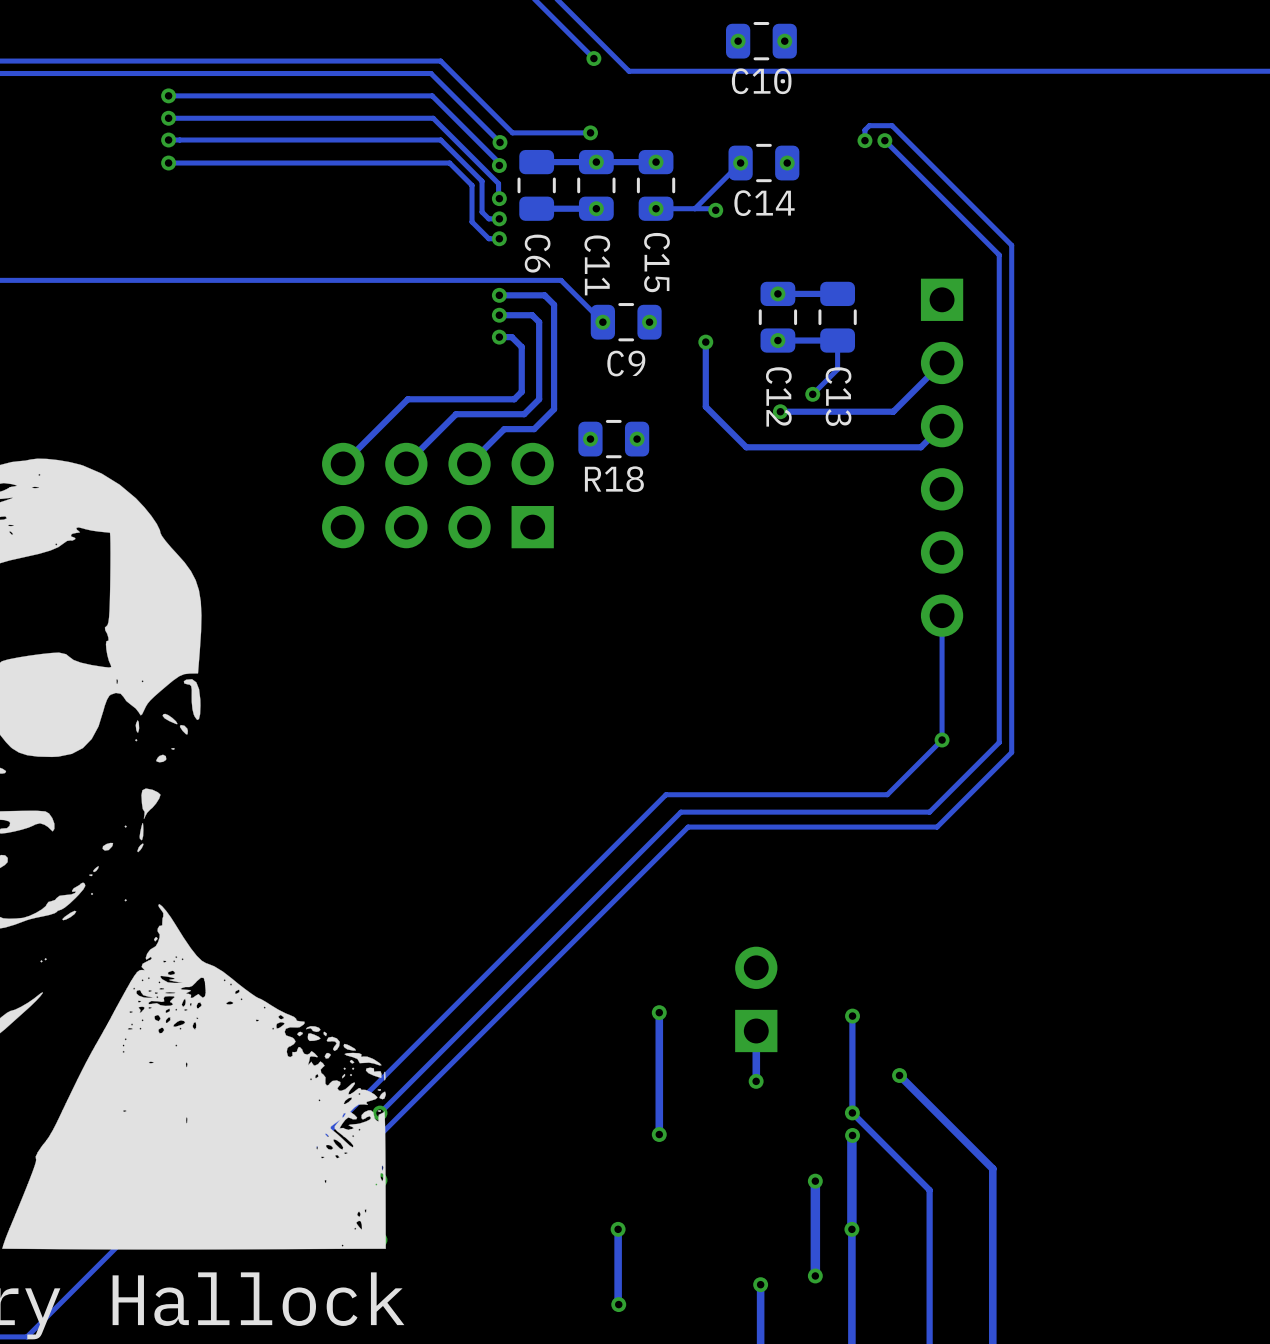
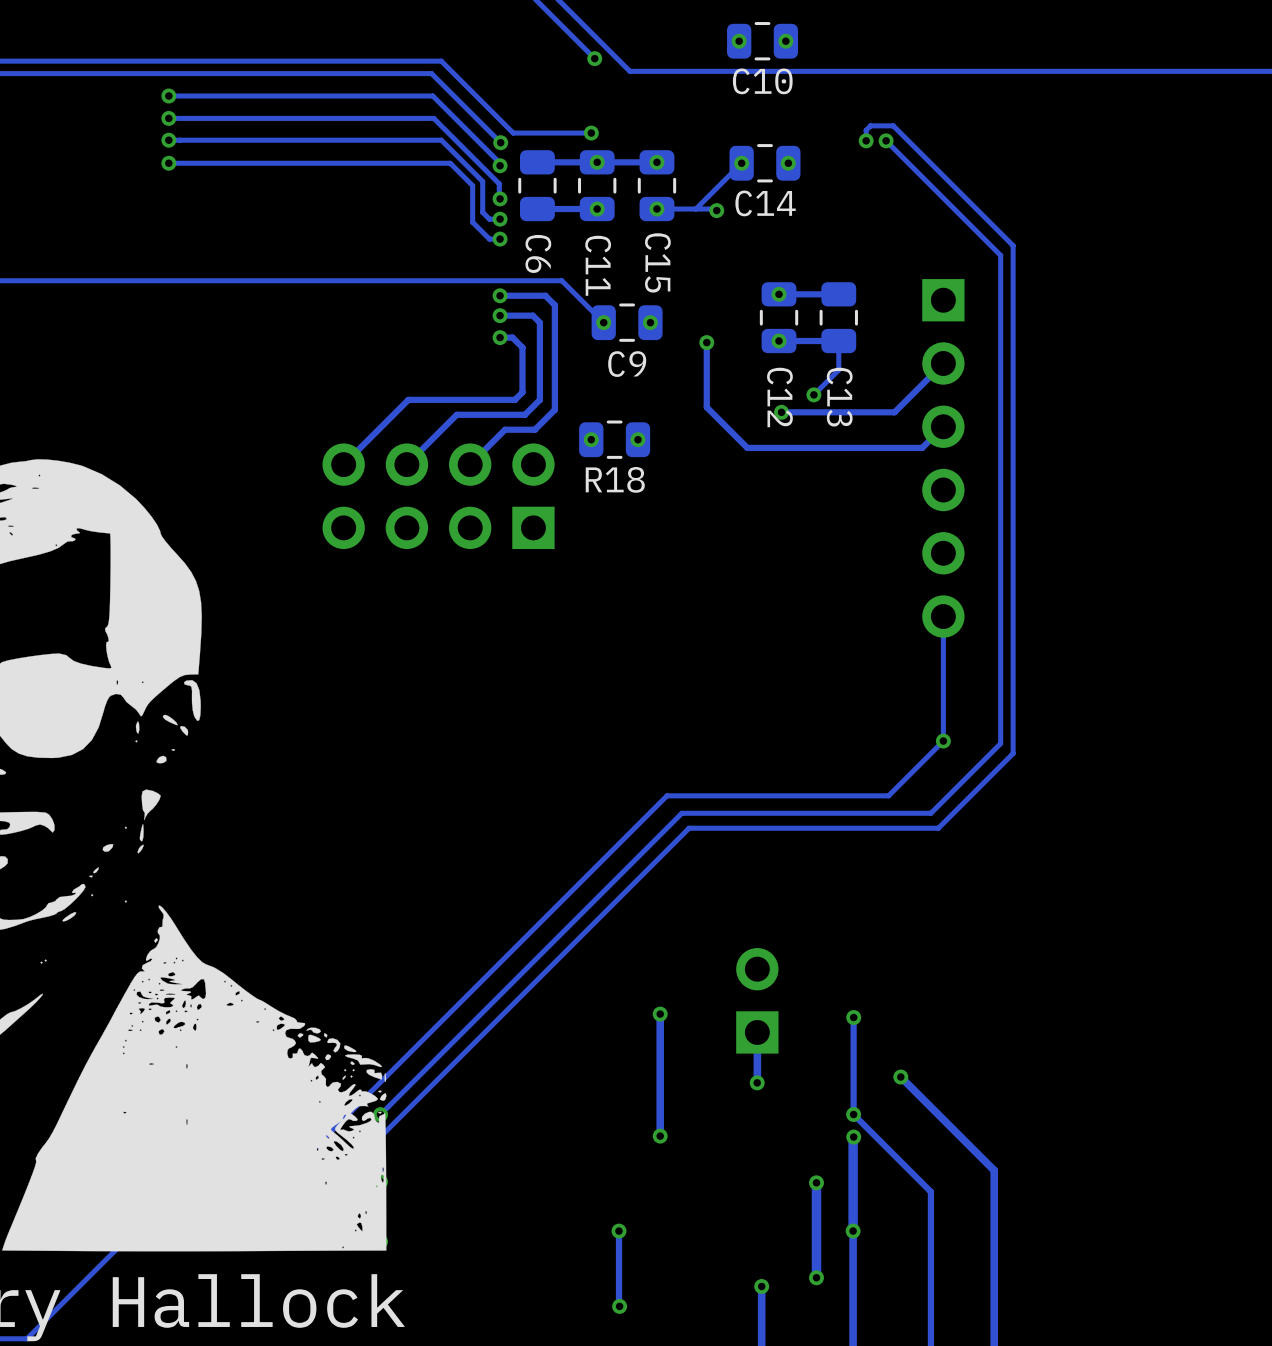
track width: thick (618, 1229) (618, 1304) -> thin (618, 1231) (619, 1306)

